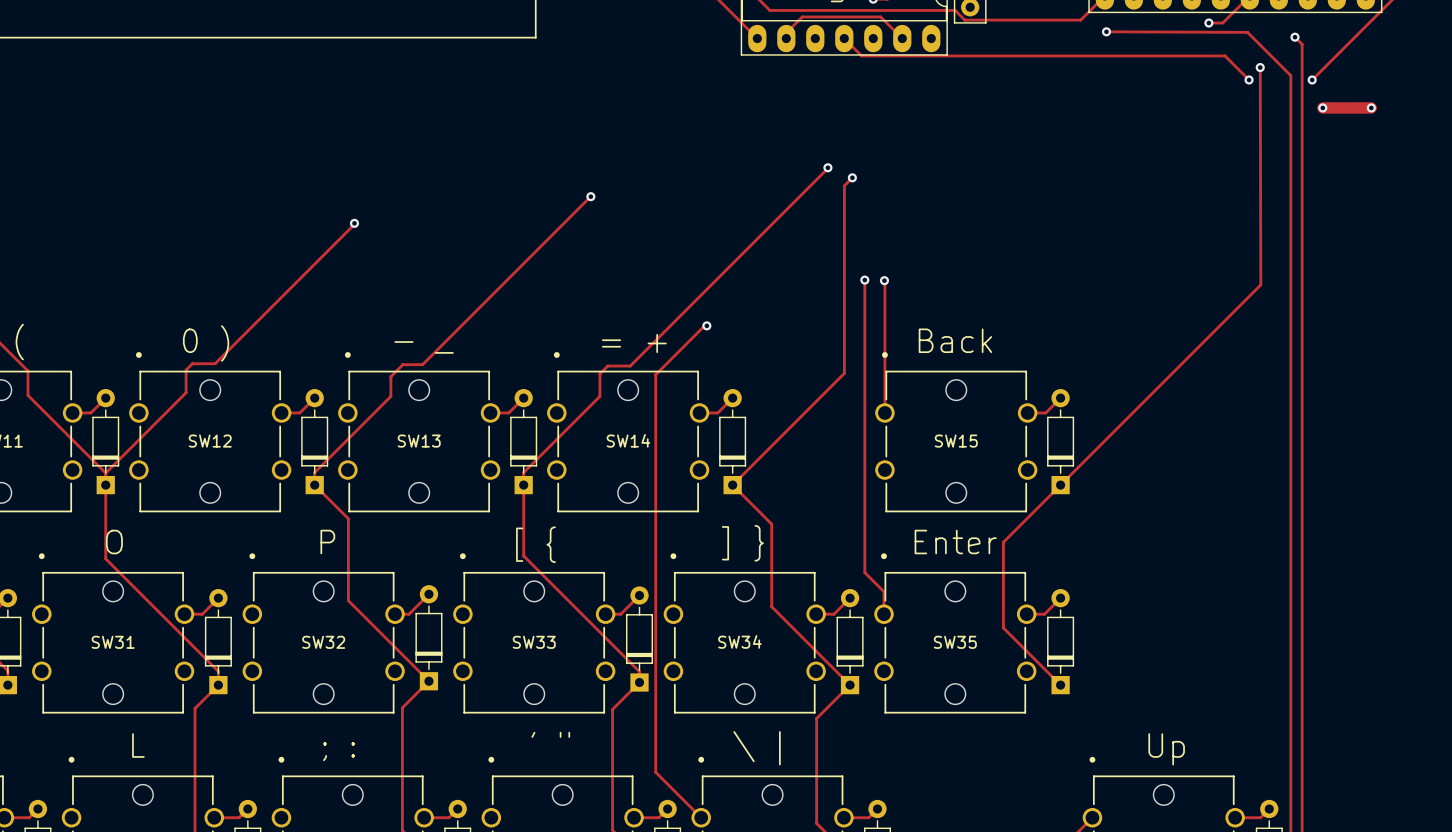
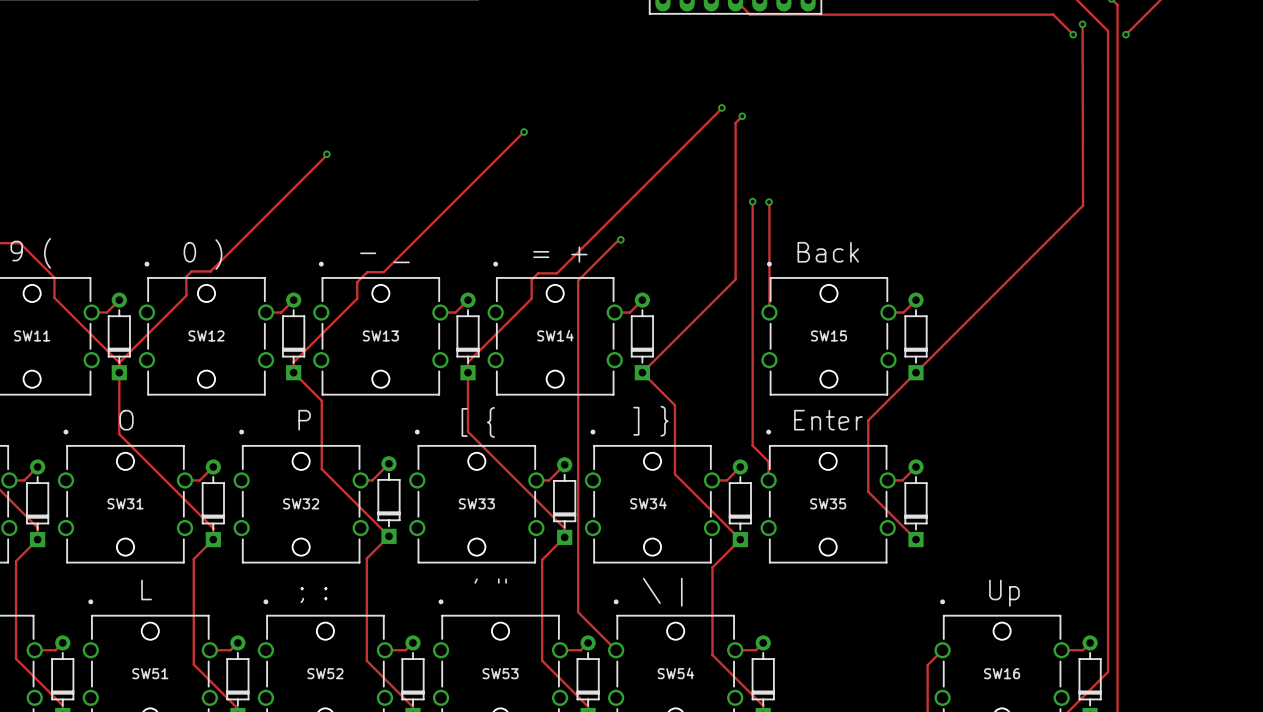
via: (1322, 107) -> none
track: (1324, 107) (1371, 107) -> none
via: (1371, 107) -> none

